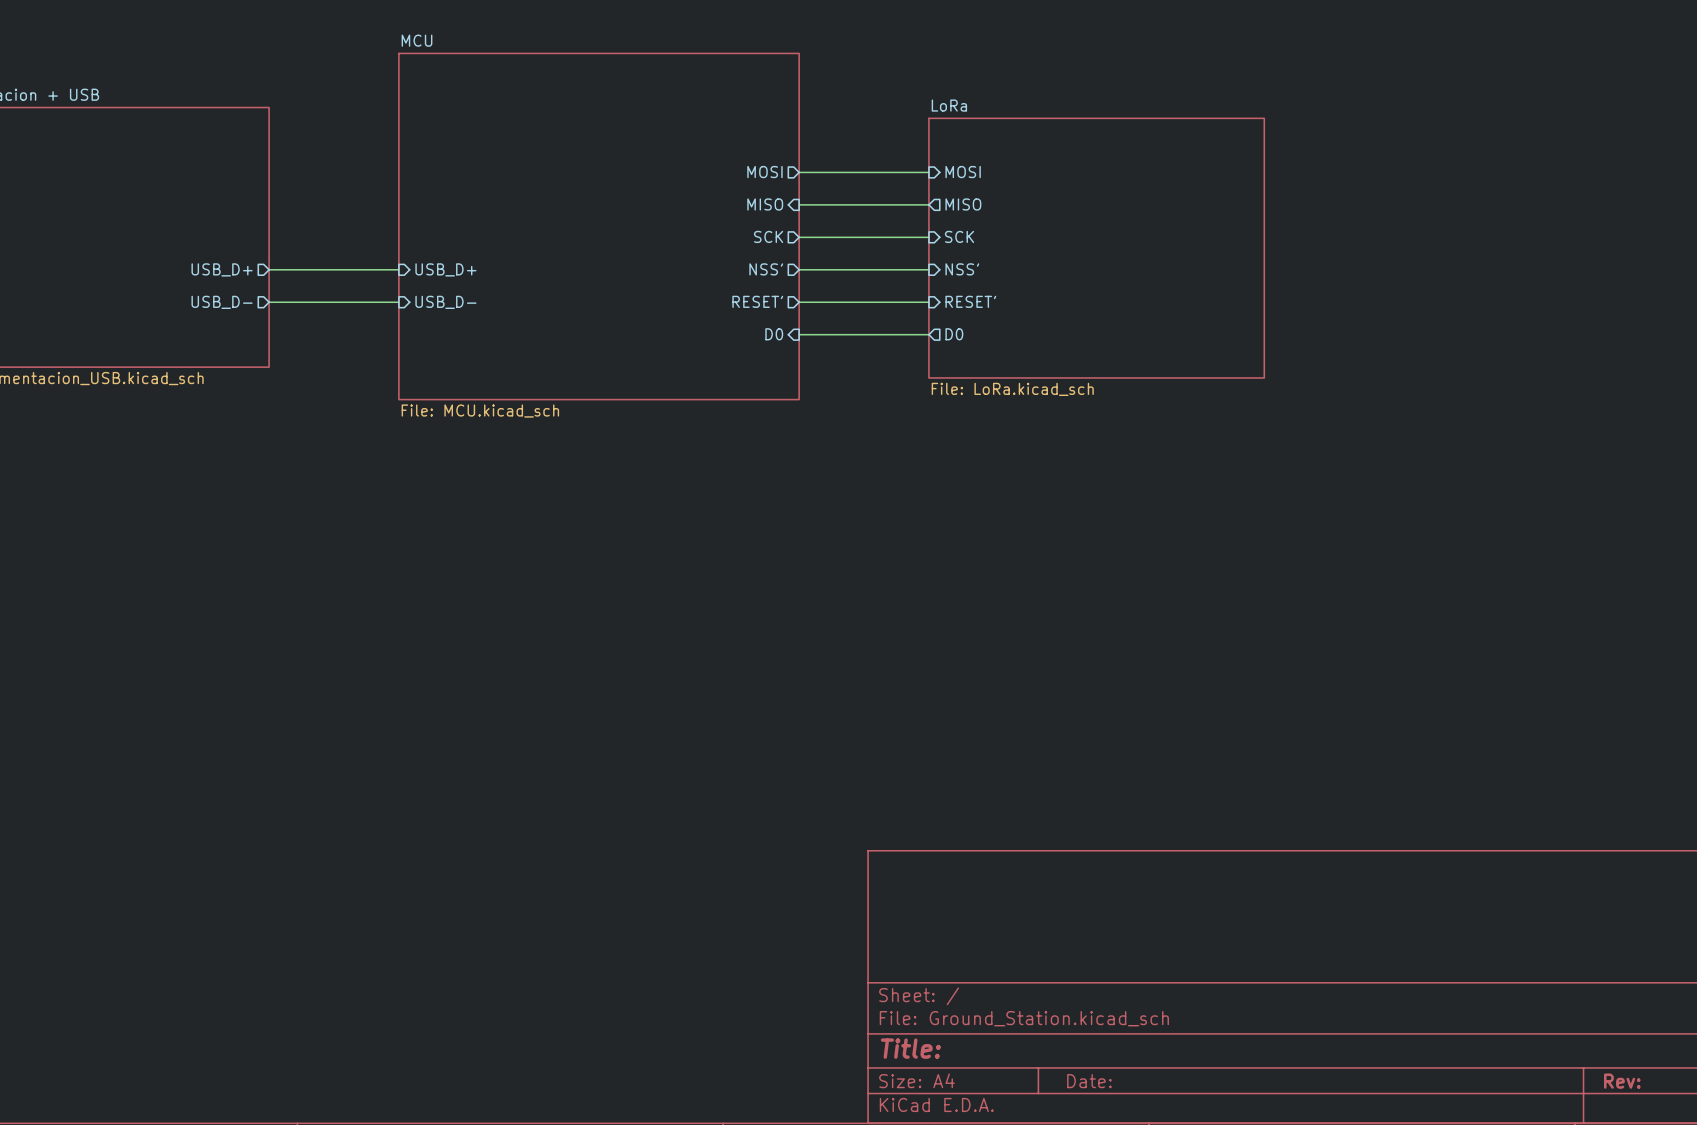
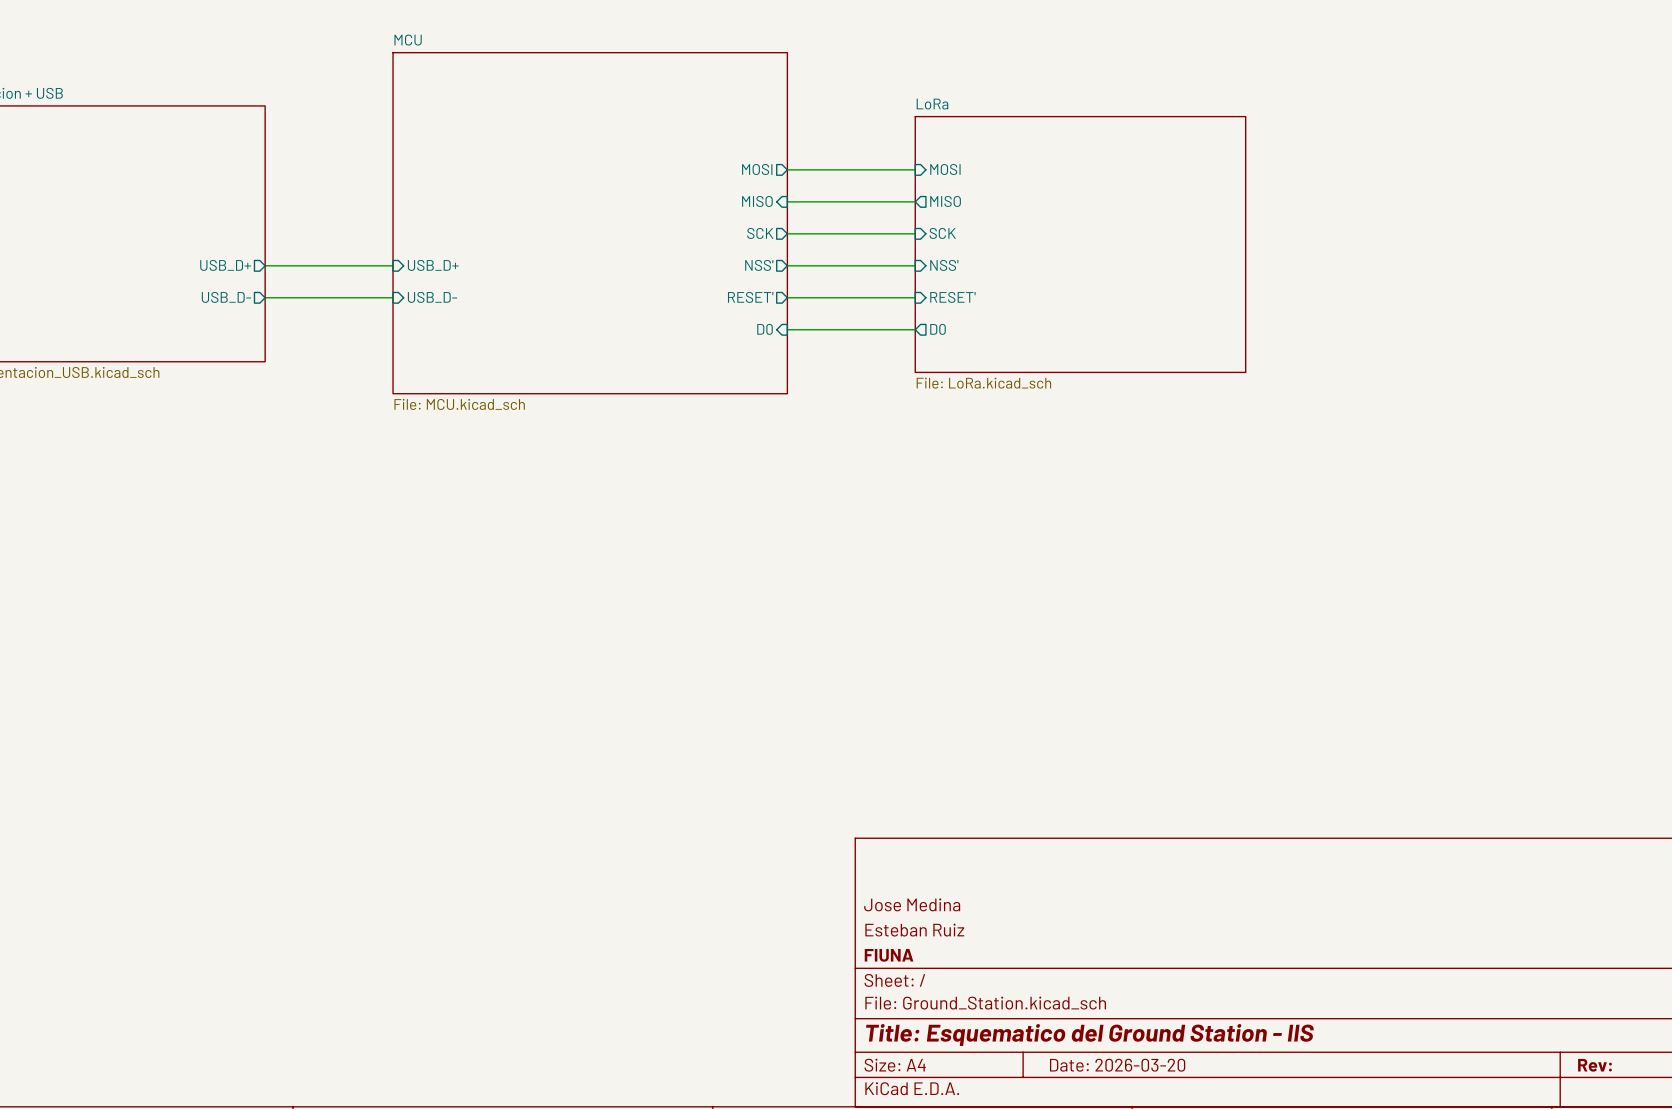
title block: none -> Jose Medina (912, 904)
title block: none -> Esteban Ruiz (914, 930)
title block: none -> FIUNA (889, 955)
title block: Title: (910, 1048) -> Title: Esquematico del Ground Station - IIS (1089, 1035)
title block: Date: (1089, 1081) -> Date: 2026-03-20 (1117, 1065)

